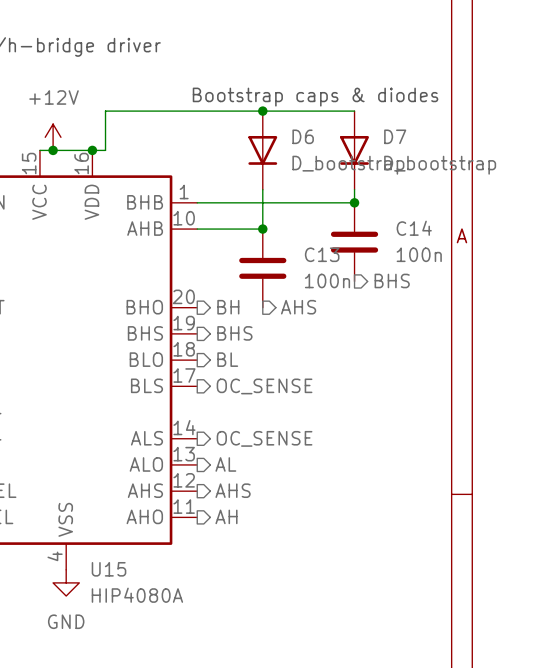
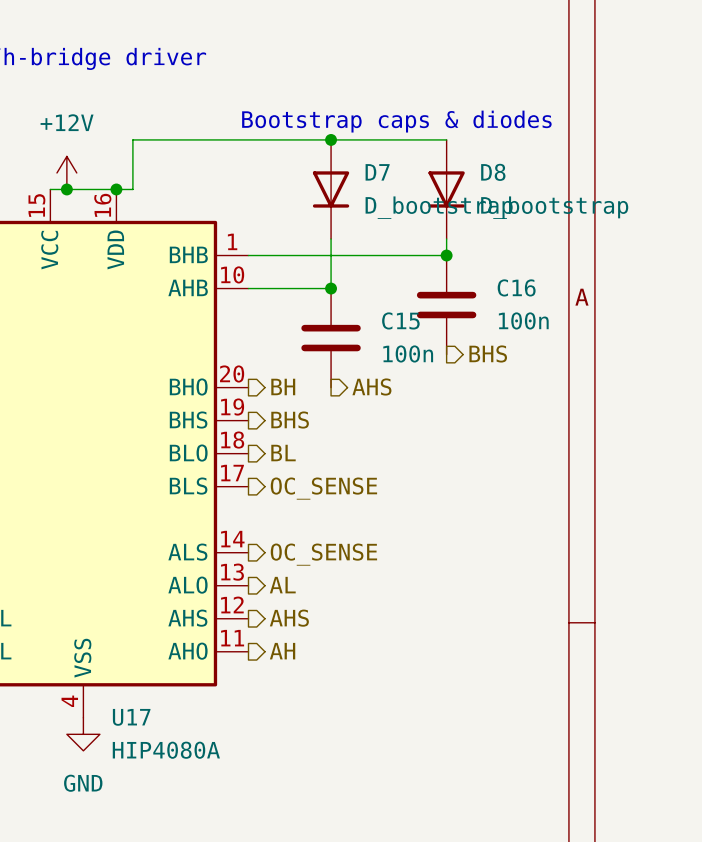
D6 name: D6 (303, 136) -> D7 (377, 172)
D7 name: D7 (395, 136) -> D8 (493, 172)
C14 name: C14 (414, 228) -> C16 (516, 287)
C13 name: C13 (322, 254) -> C15 (400, 320)
U15 name: U15 (109, 569) -> U17 (131, 717)

